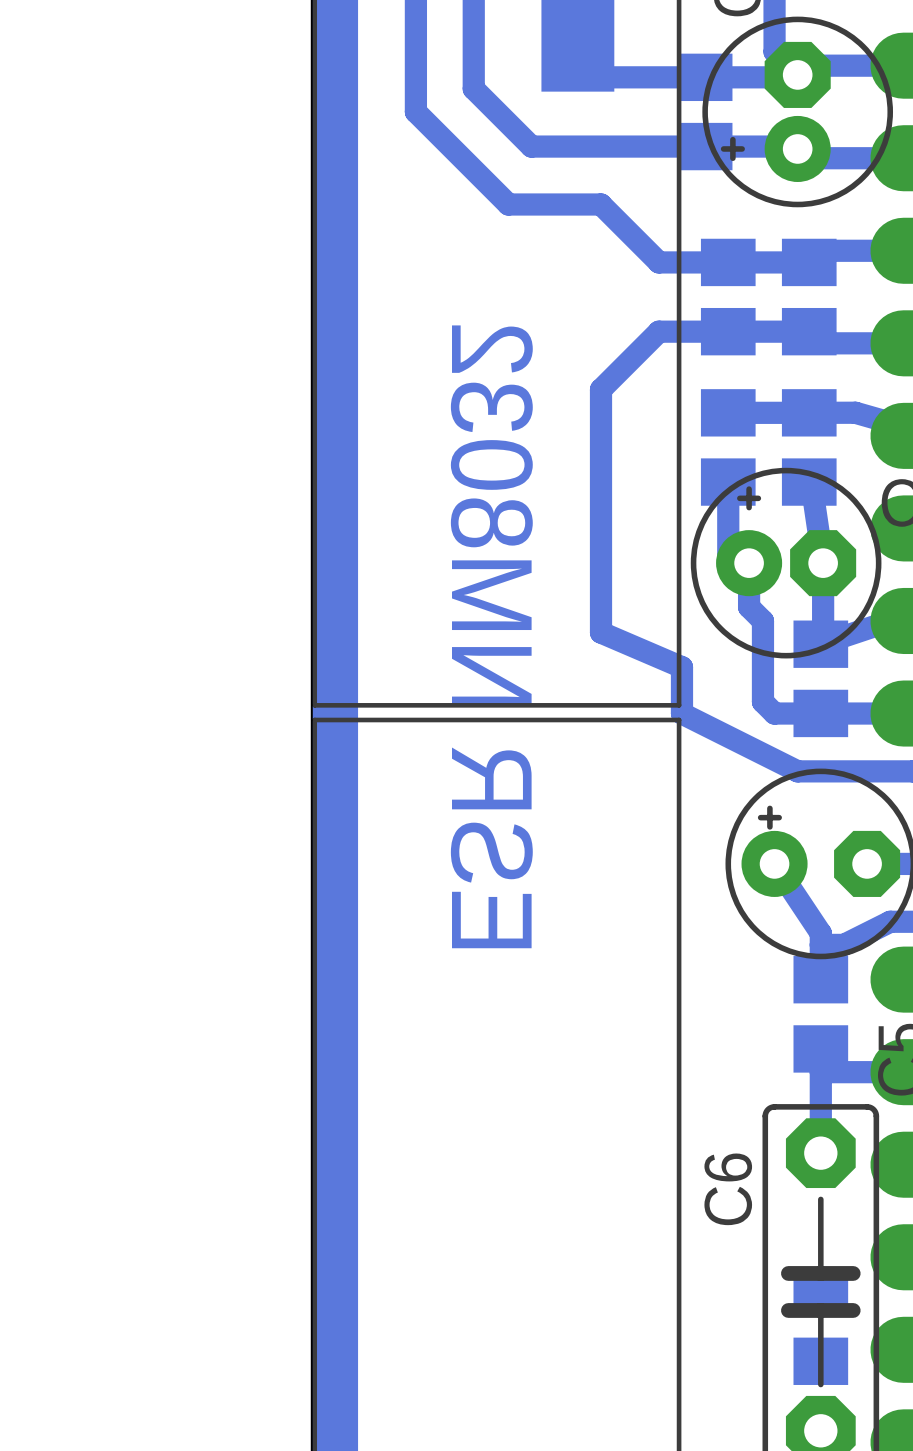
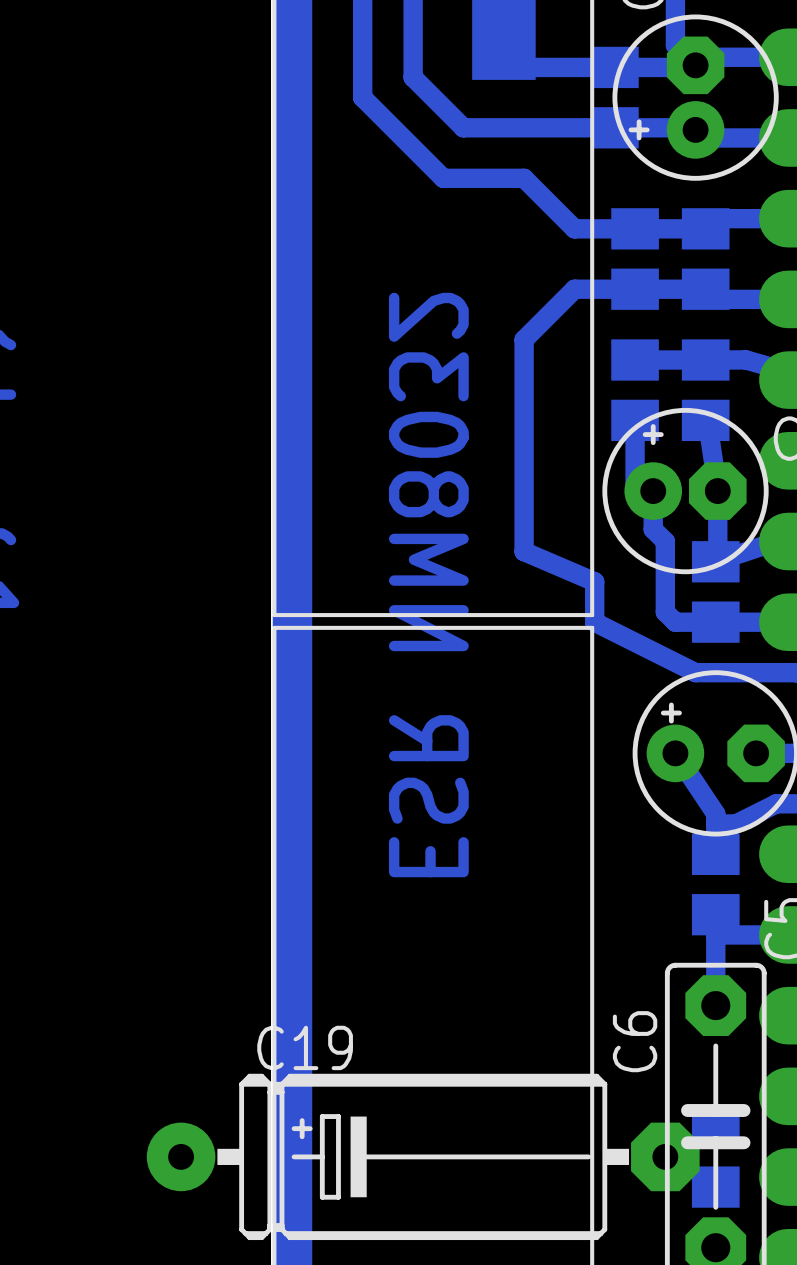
C19: none -> (423, 1156)

